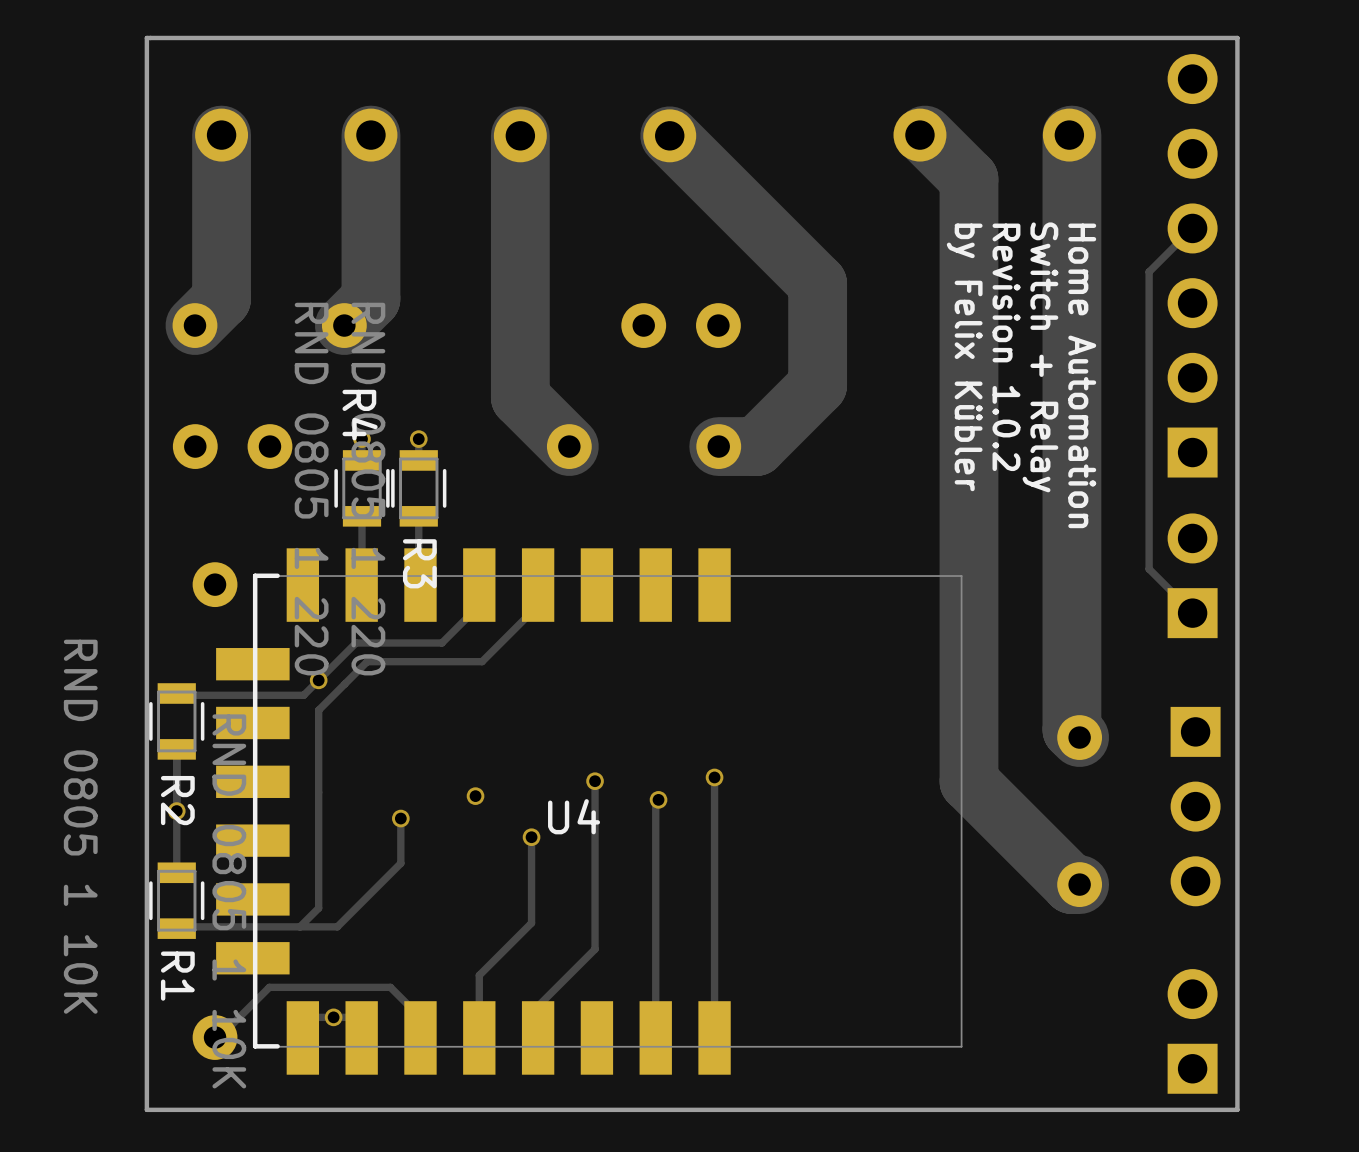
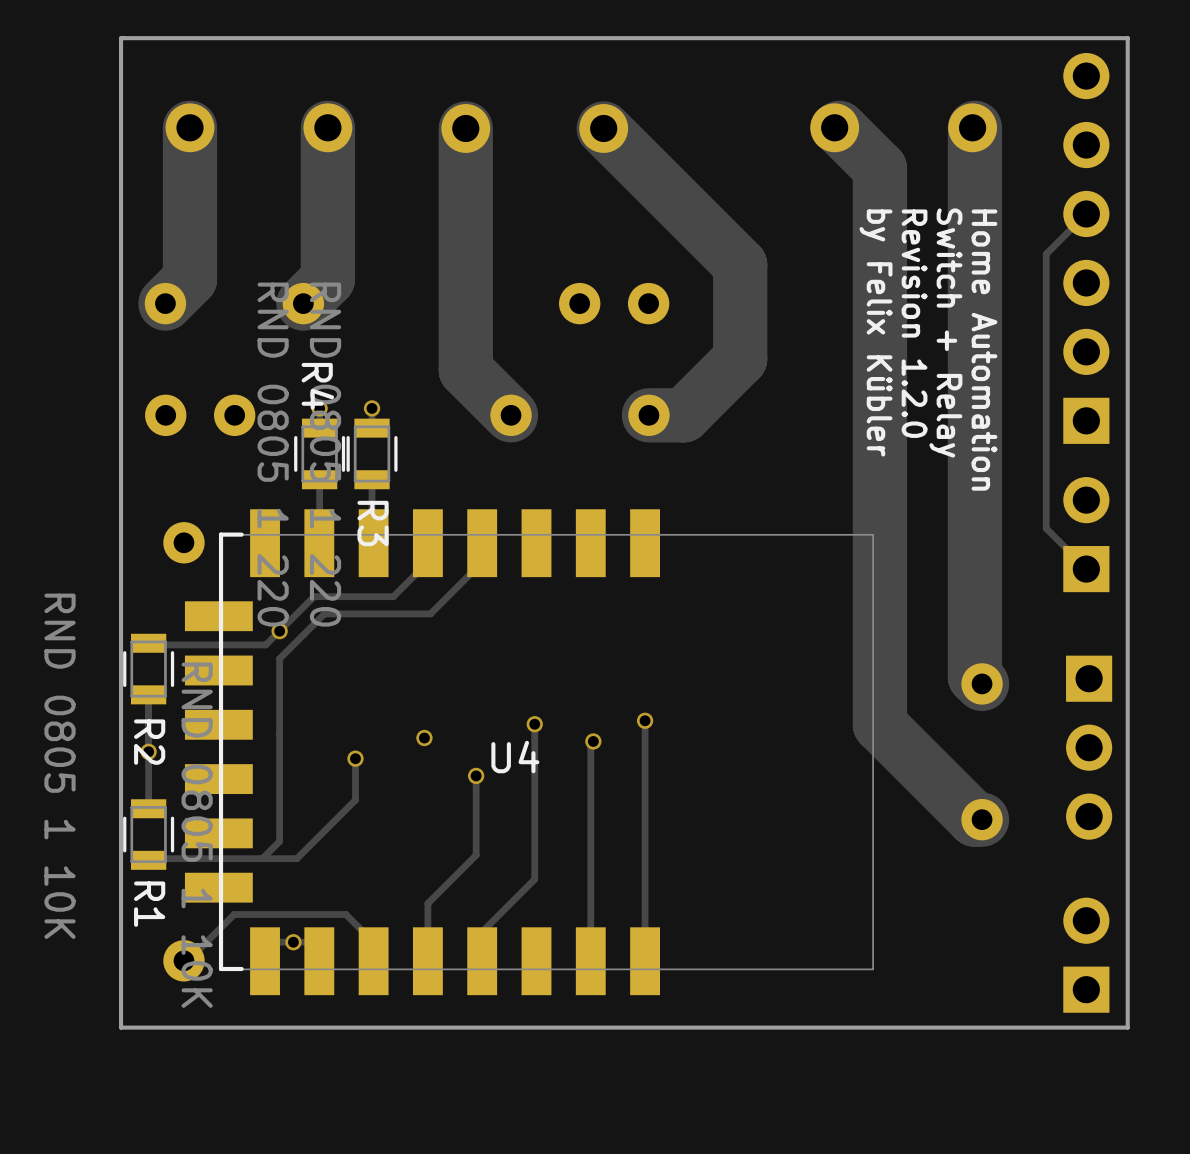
text: Revision 1.0.2 (1006, 347) -> Revision 1.2.0 (914, 323)

